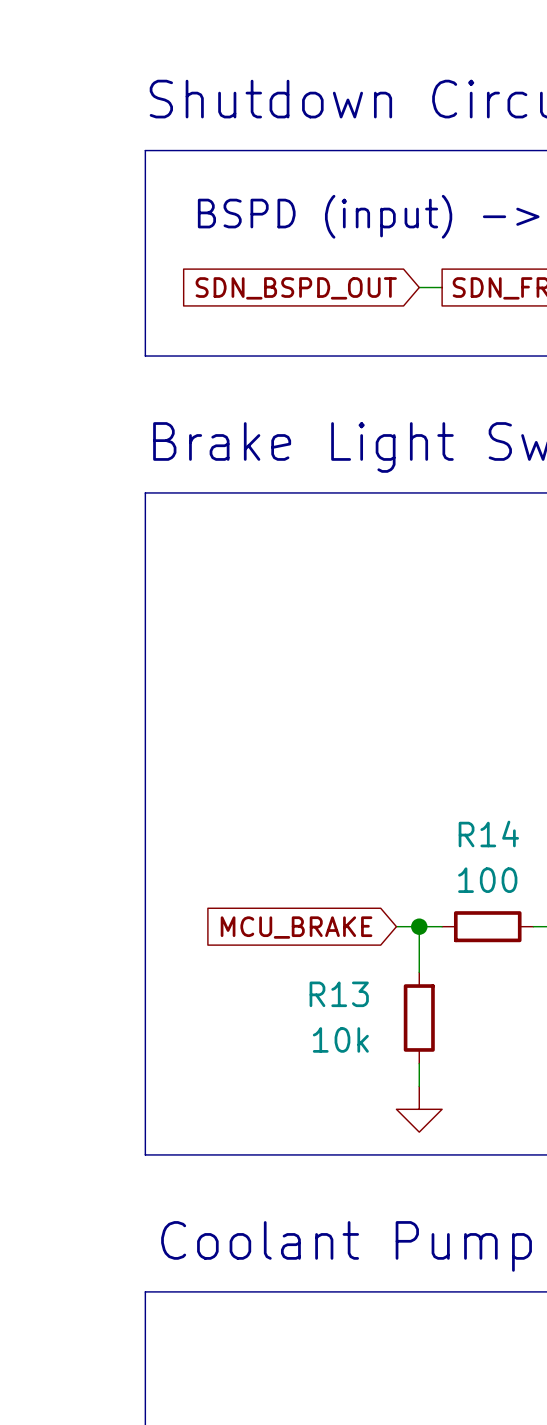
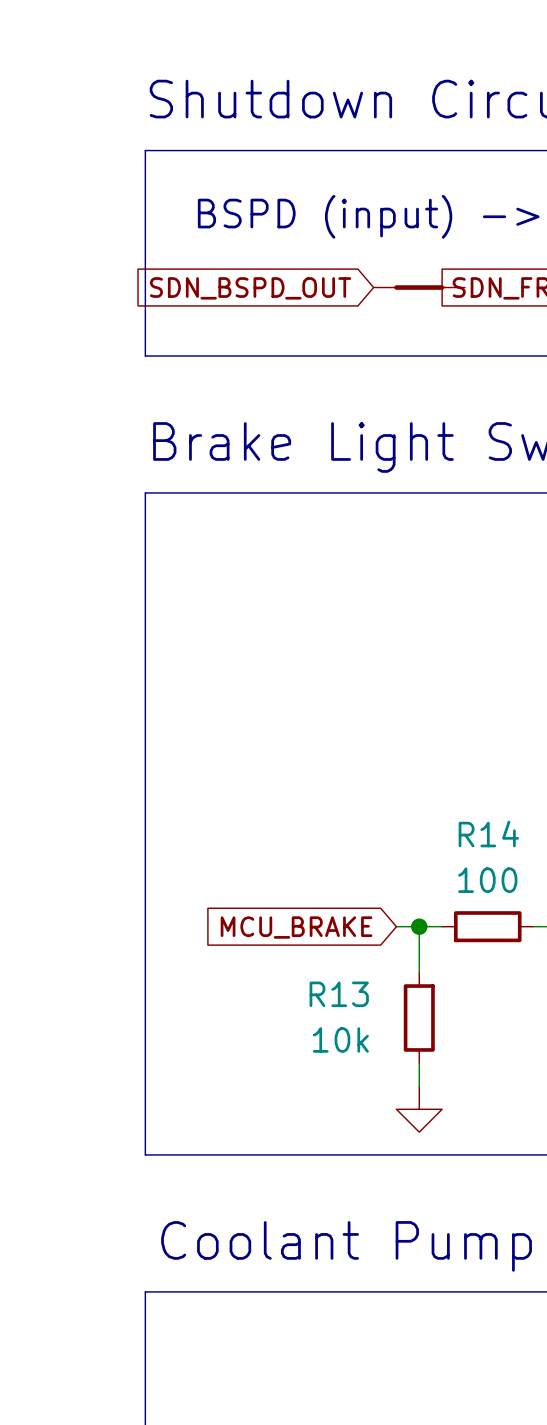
part: none -> (419, 287)
global label position: SDN_BSPD_OUT (296, 288) -> SDN_BSPD_OUT (250, 288)

